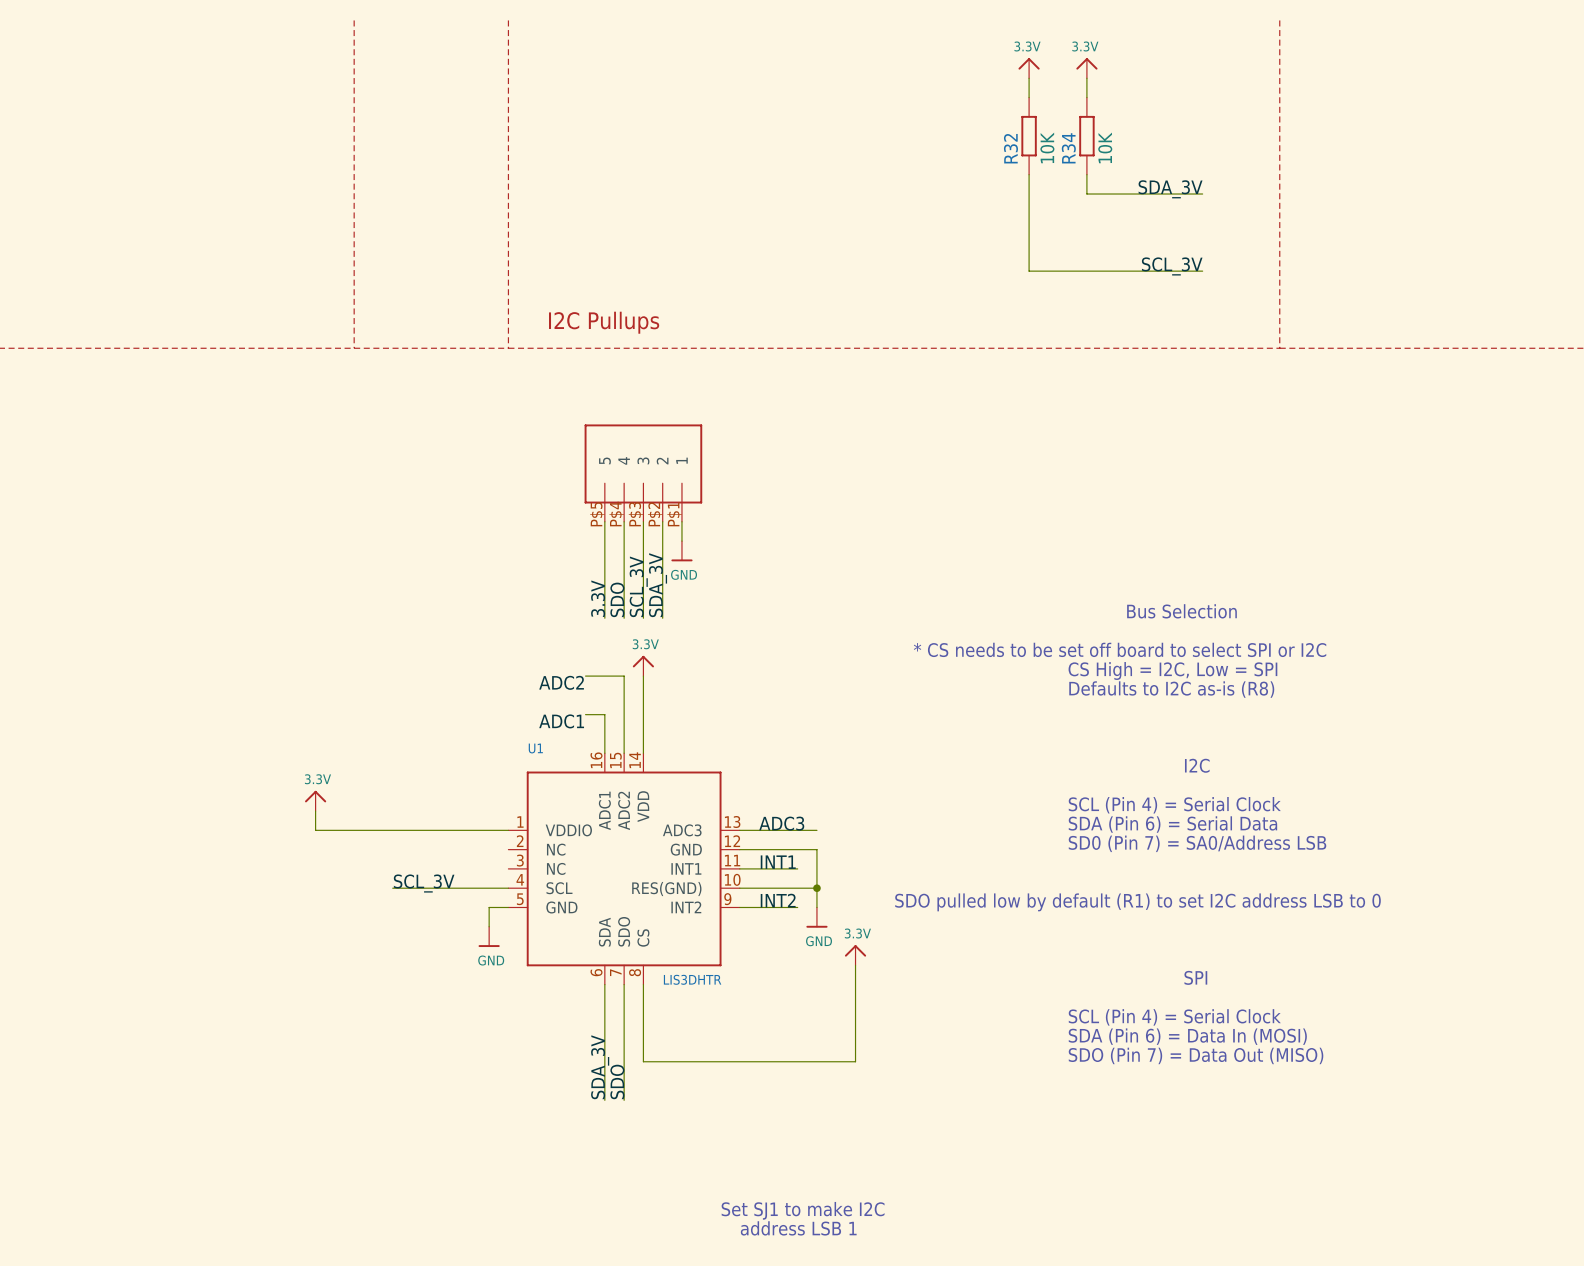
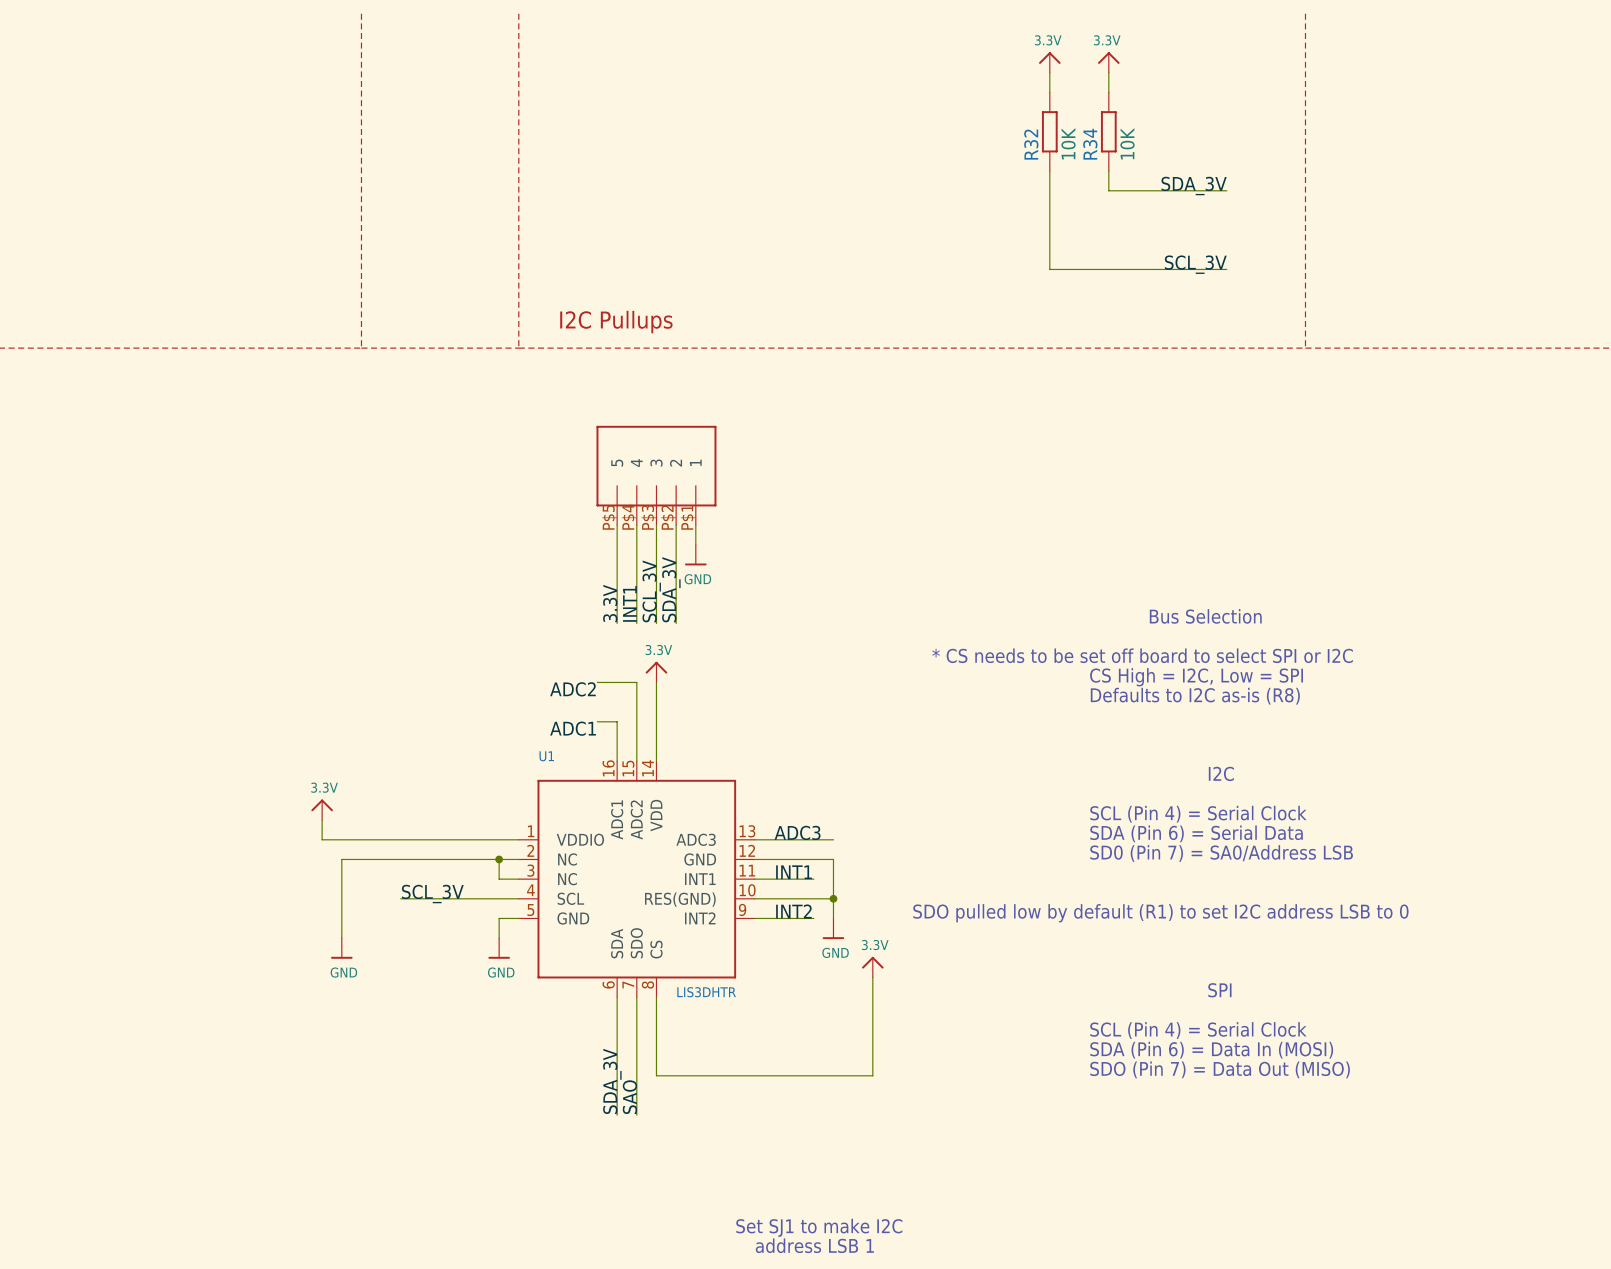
label: SDO (617, 599) -> INT1 (629, 603)
wire: none -> (499, 859) (499, 879) (518, 879)
junction: none -> (499, 859)
wire: none -> (518, 859) (341, 859) (341, 938)
power symbol: none -> GND (341, 948)
label: SDO (617, 1081) -> SAO (629, 1097)

